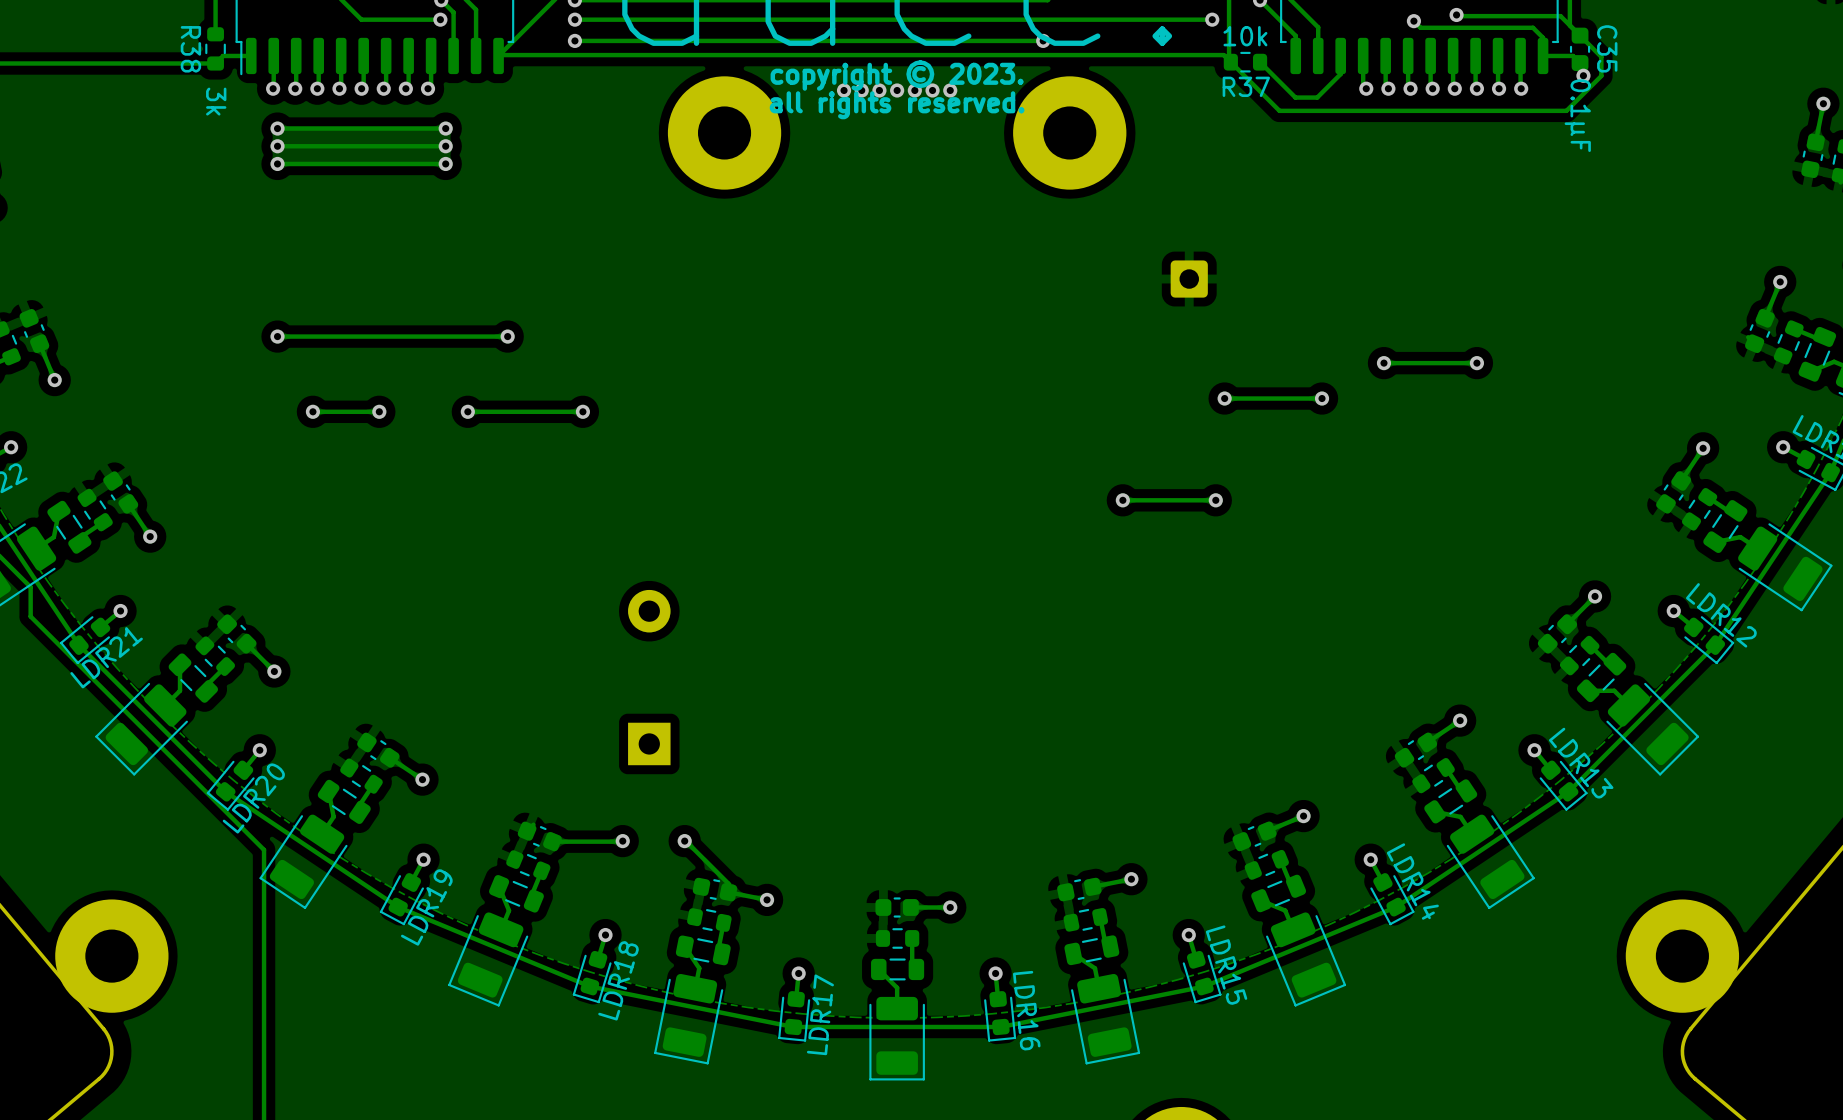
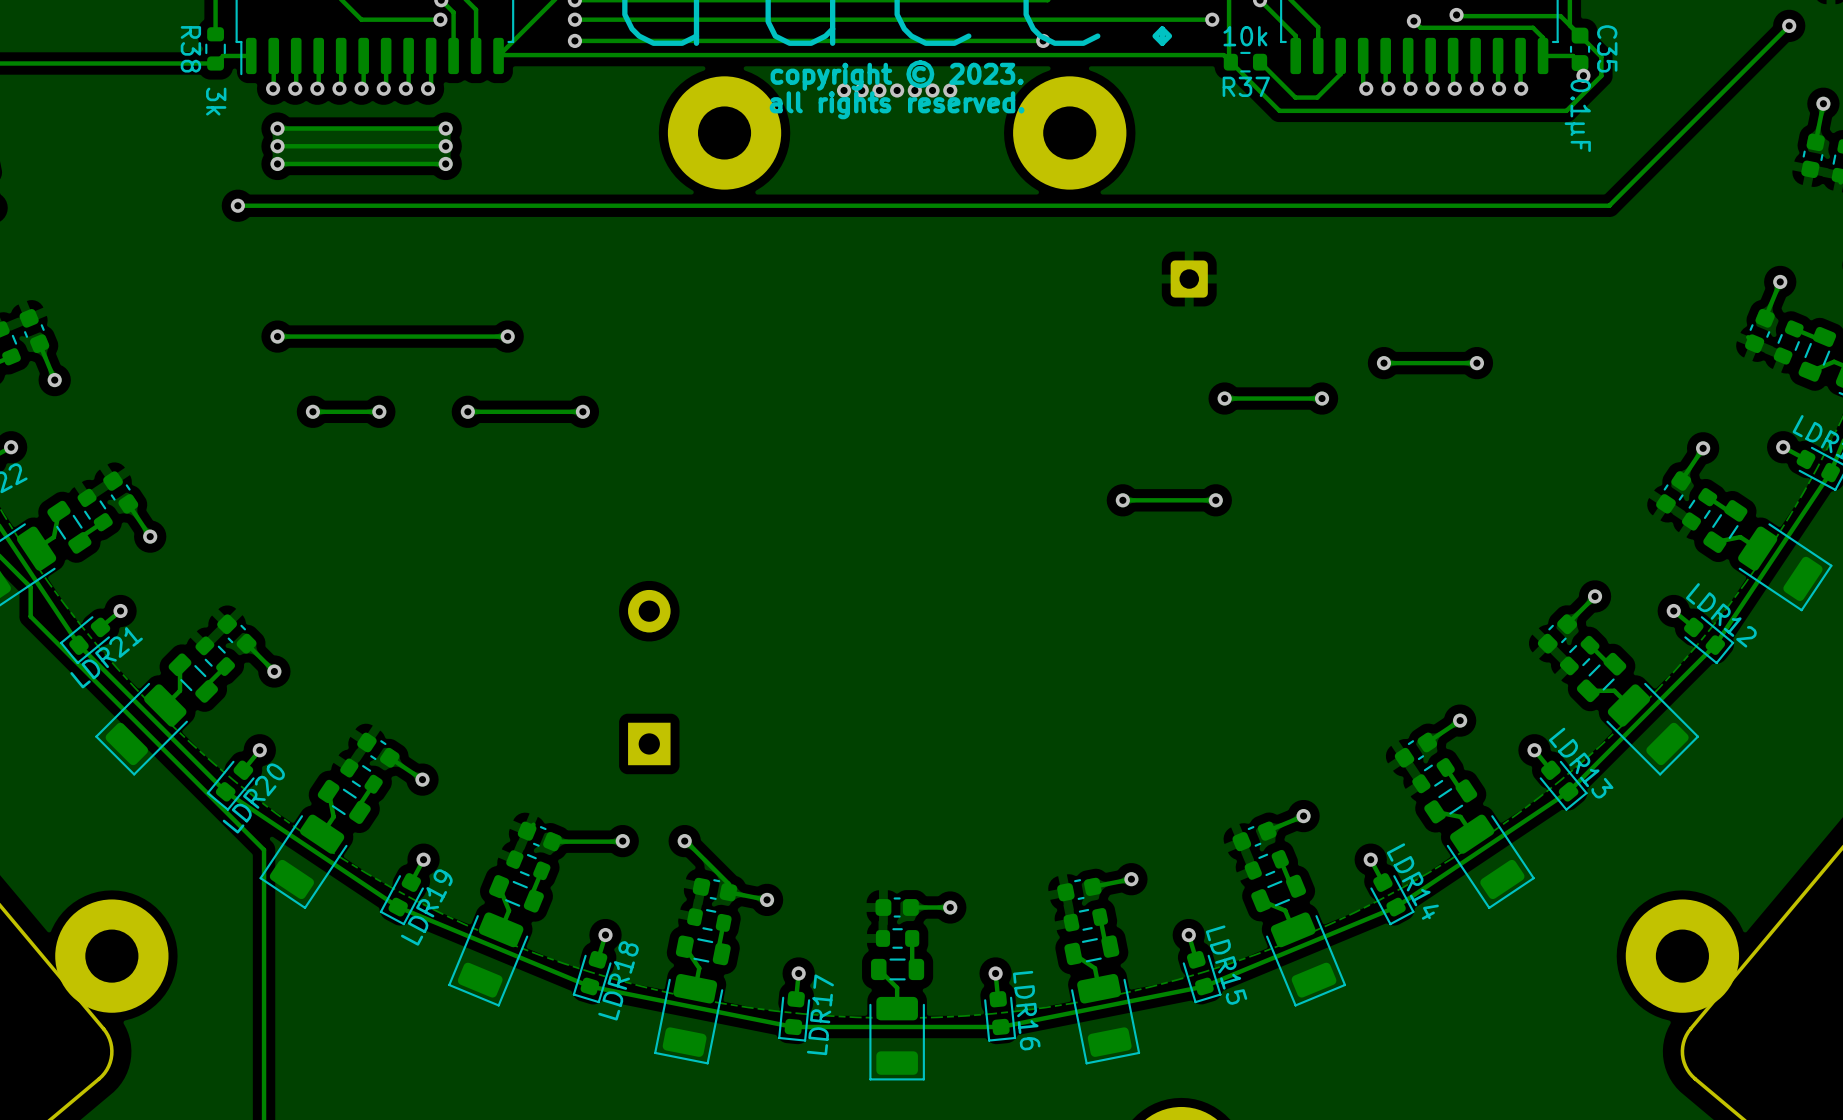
track: none -> (1789, 25) (1609, 205) (237, 205)
via: none -> (1789, 25)
via: none -> (237, 205)

